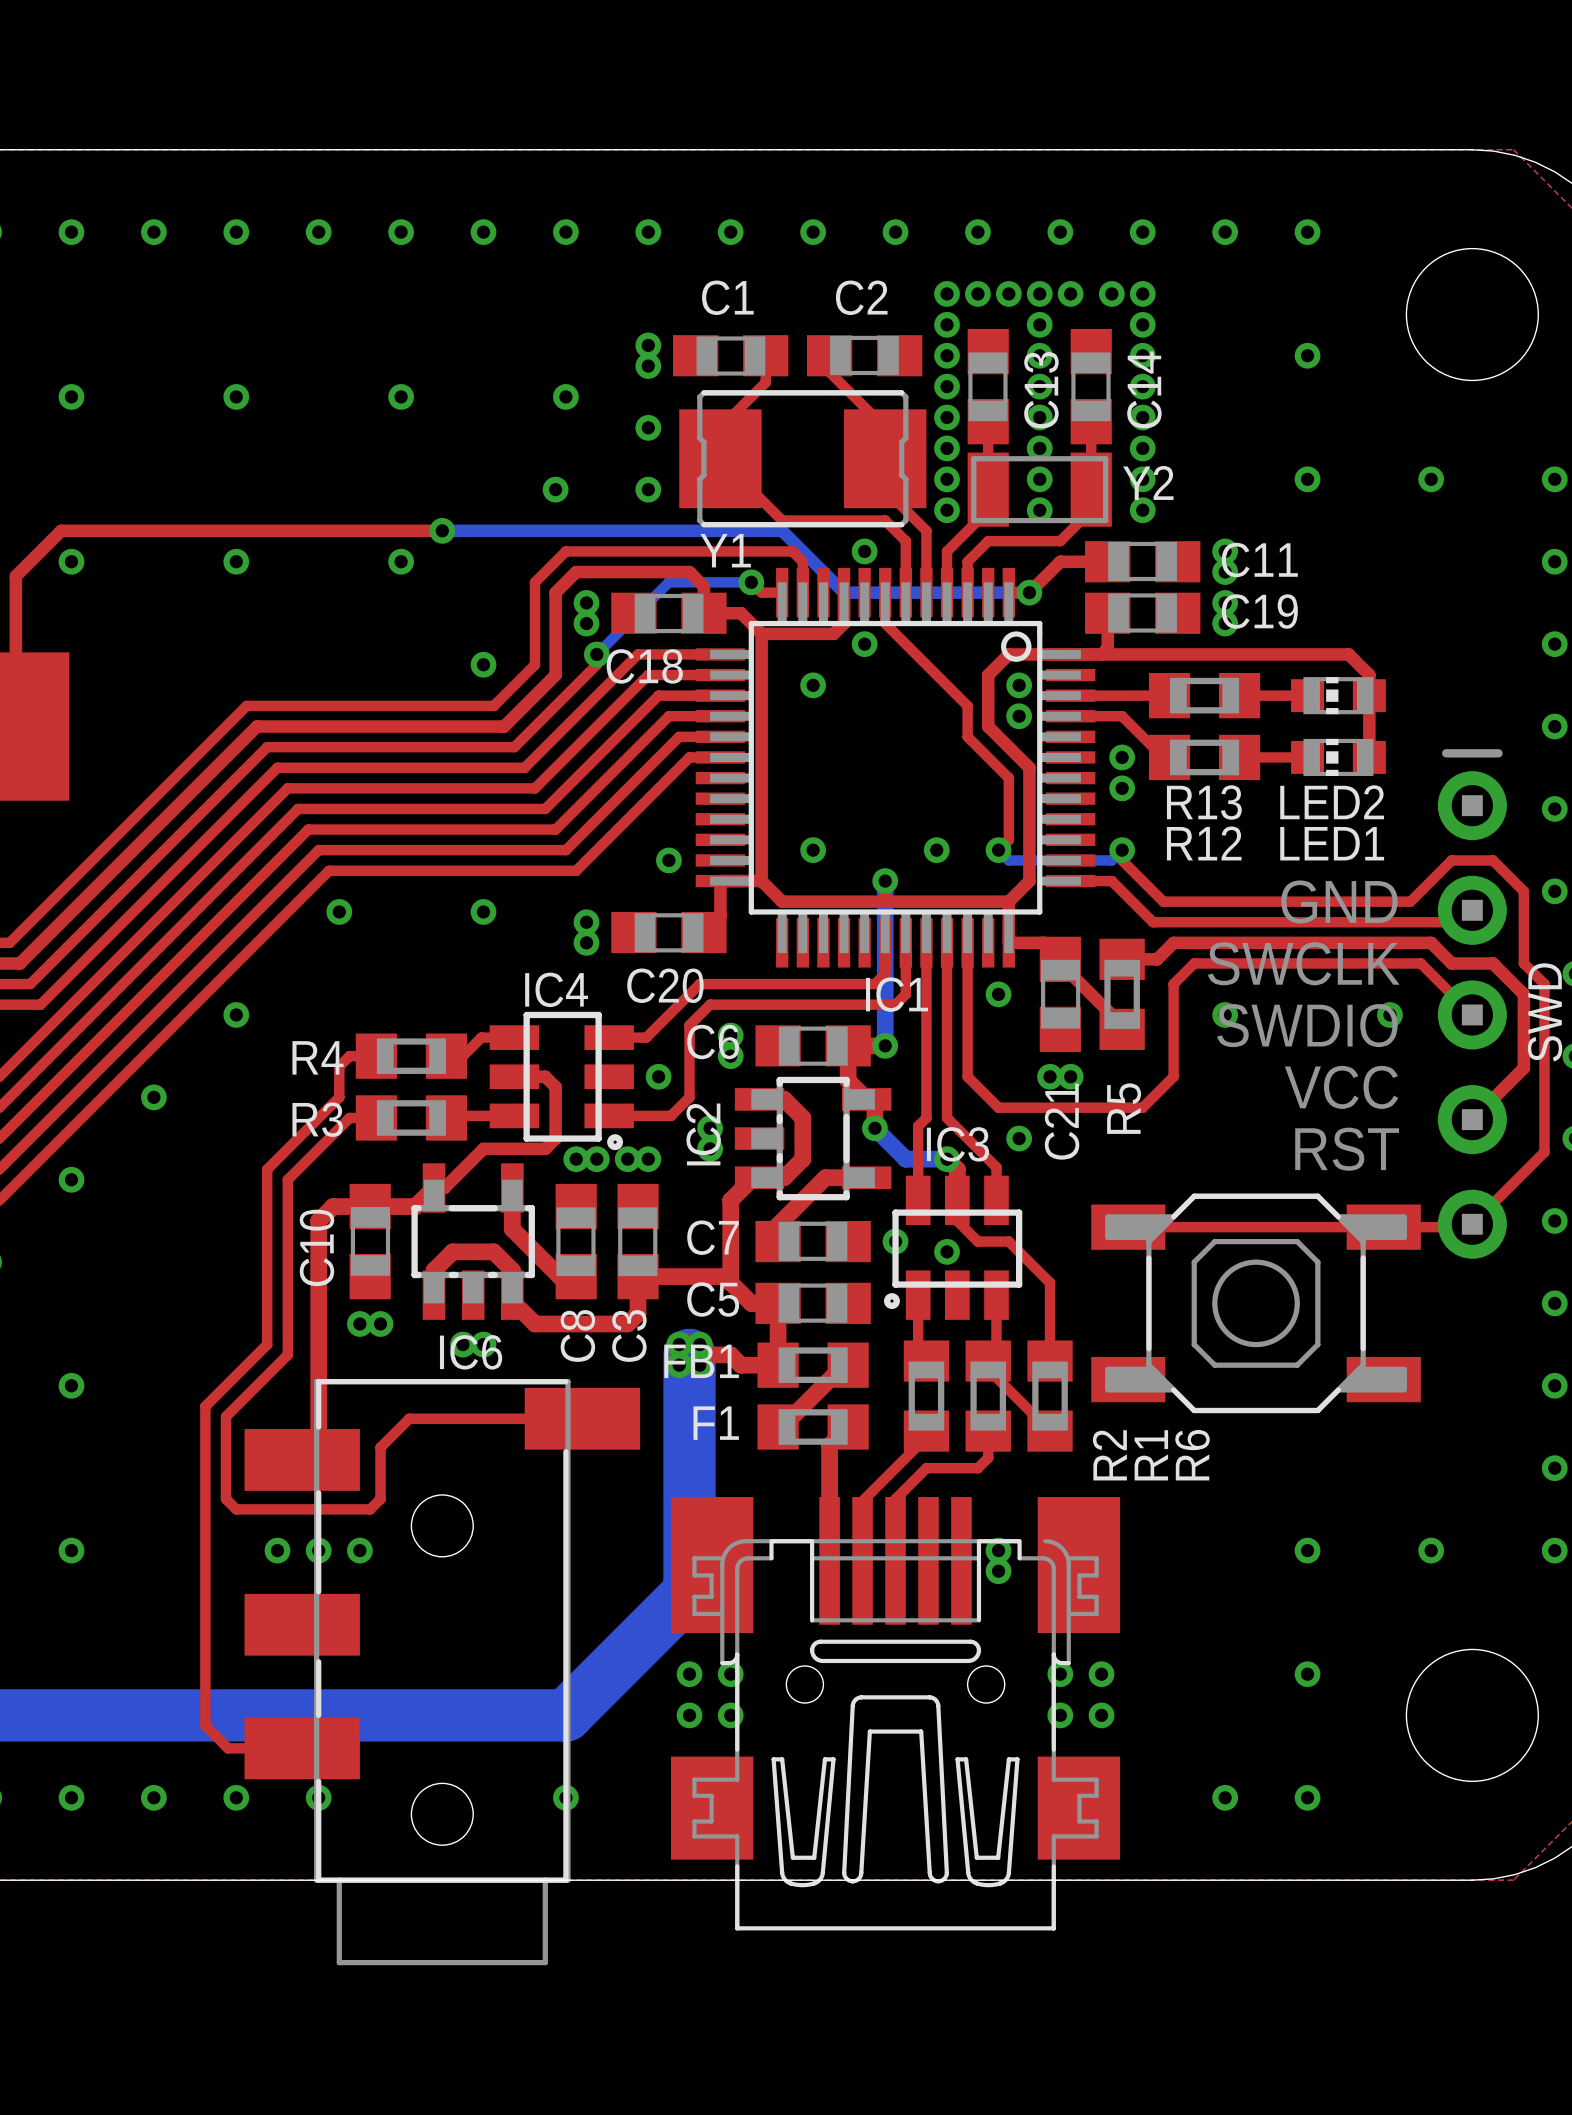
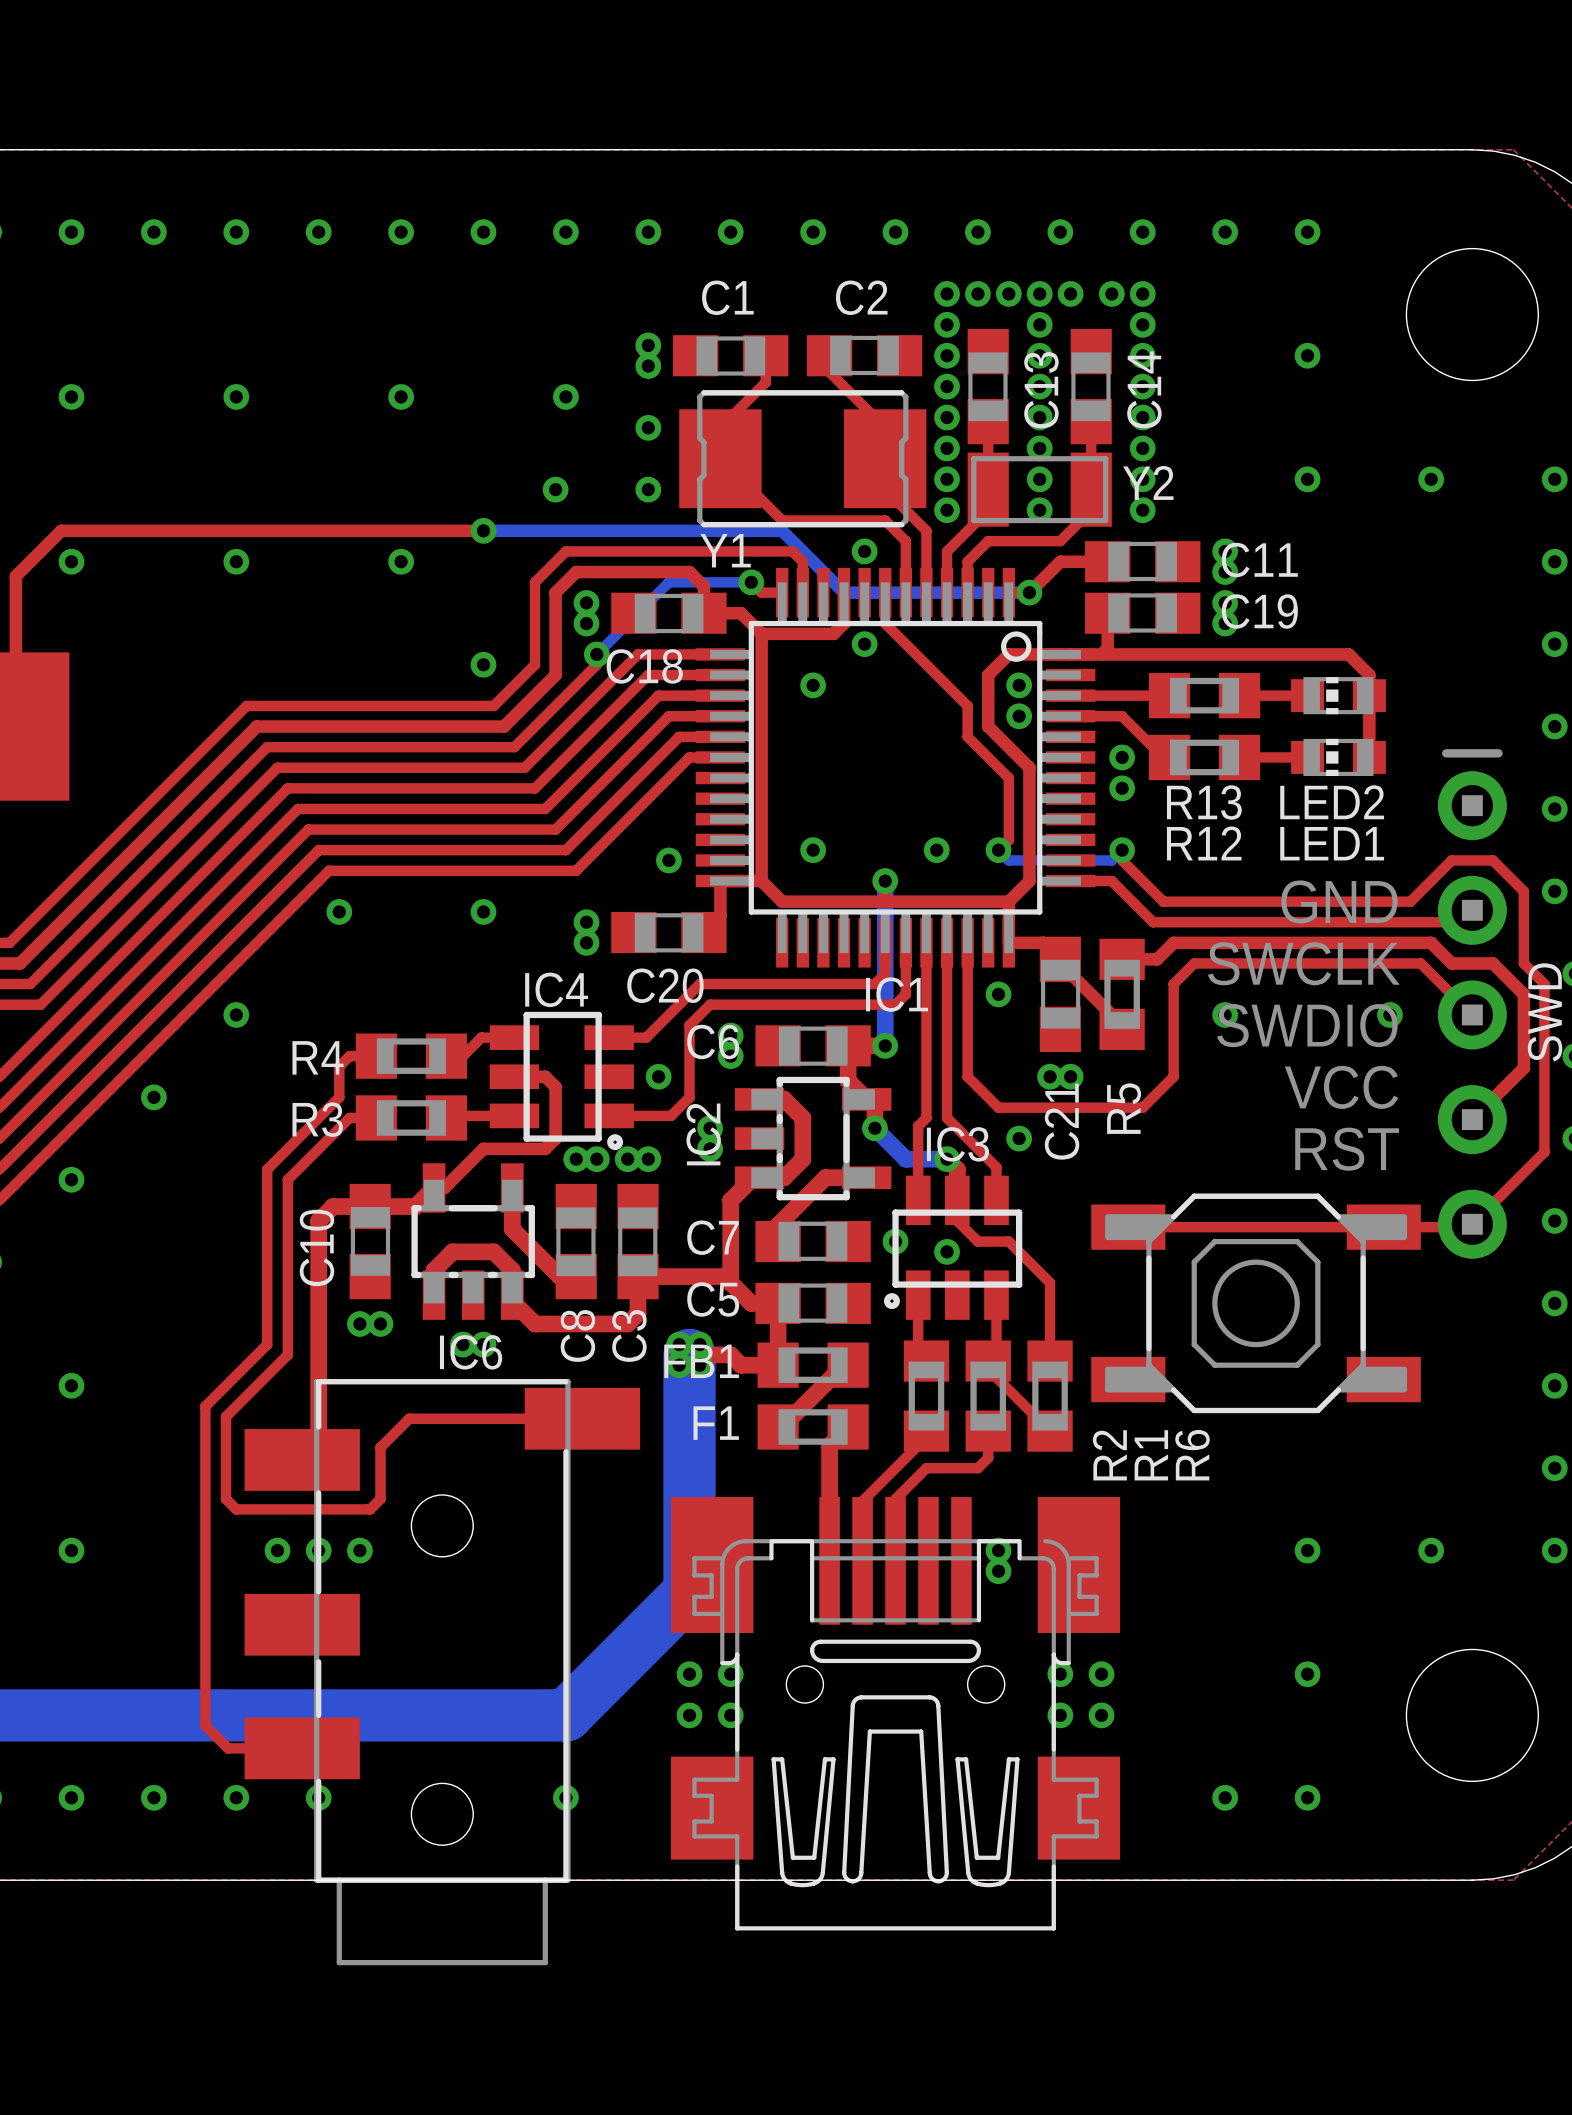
bottom track: (442, 530) (483, 530) -> none
top track: none -> (442, 530) (483, 530)
via position: (442, 530) -> (483, 530)

